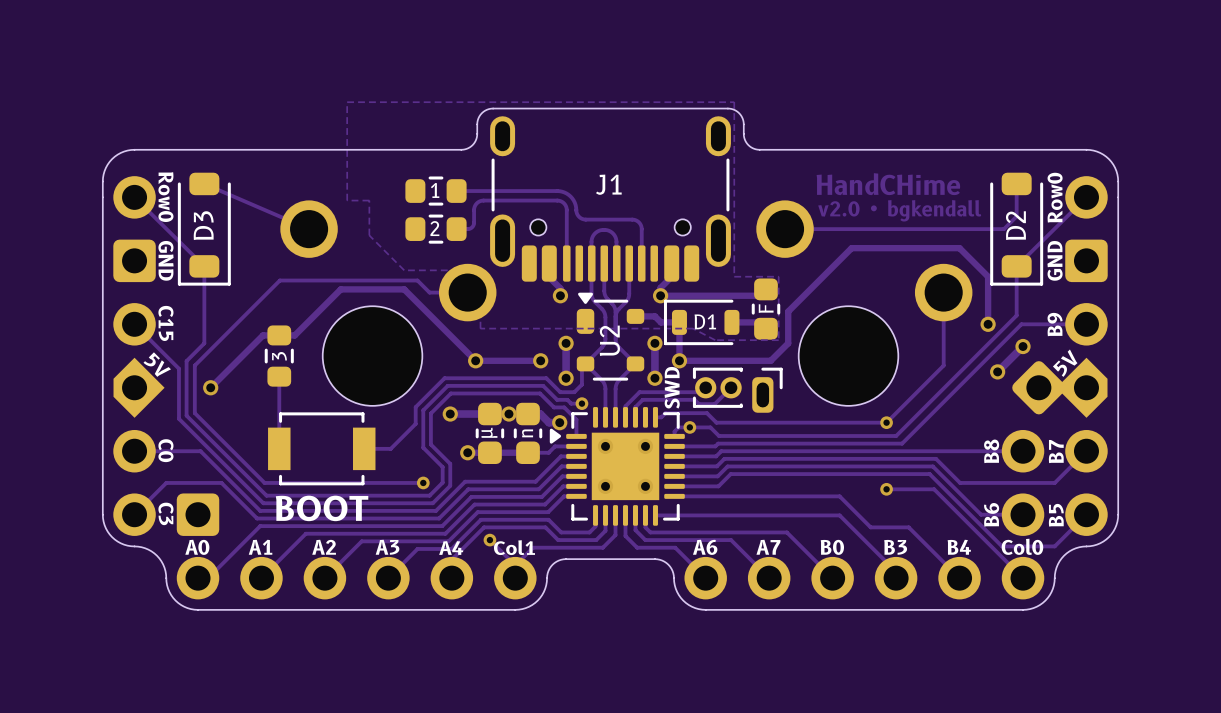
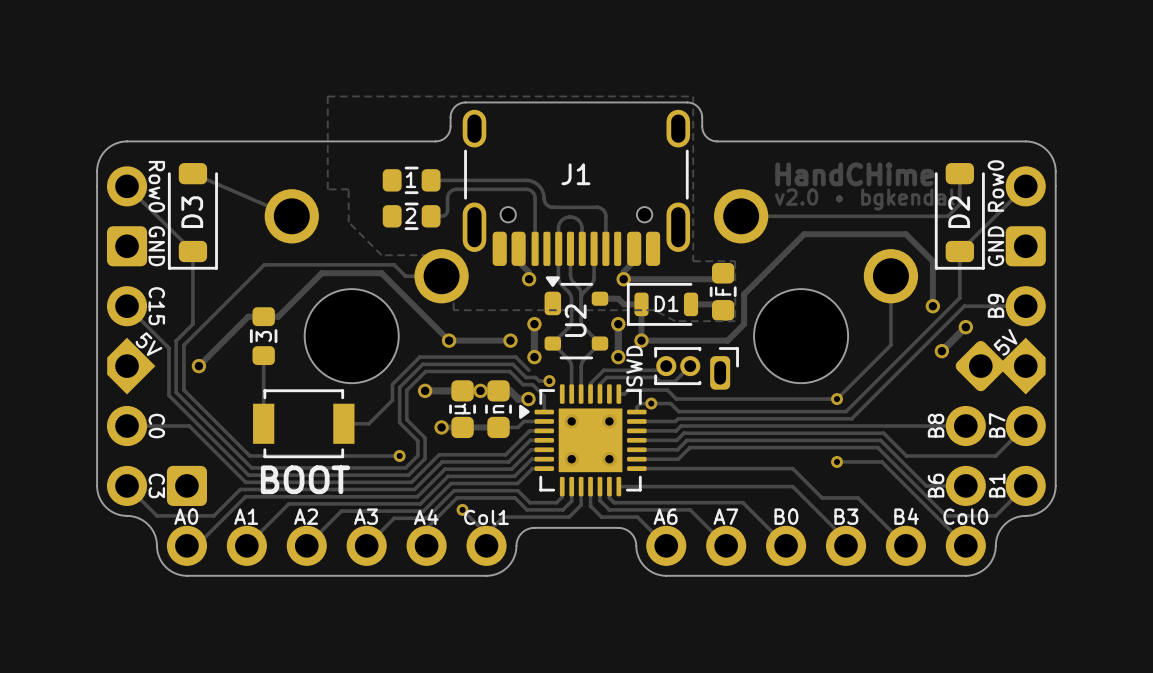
track: (585, 363) (581, 367) (581, 384) (574, 392) (560, 392) -> none
track: (134, 514) (166, 482) (221, 482) (257, 518) -> (127, 485) (156, 515) (213, 515) (240, 489) (242, 489)
part text: B5 (1056, 515) -> B1 (997, 485)

